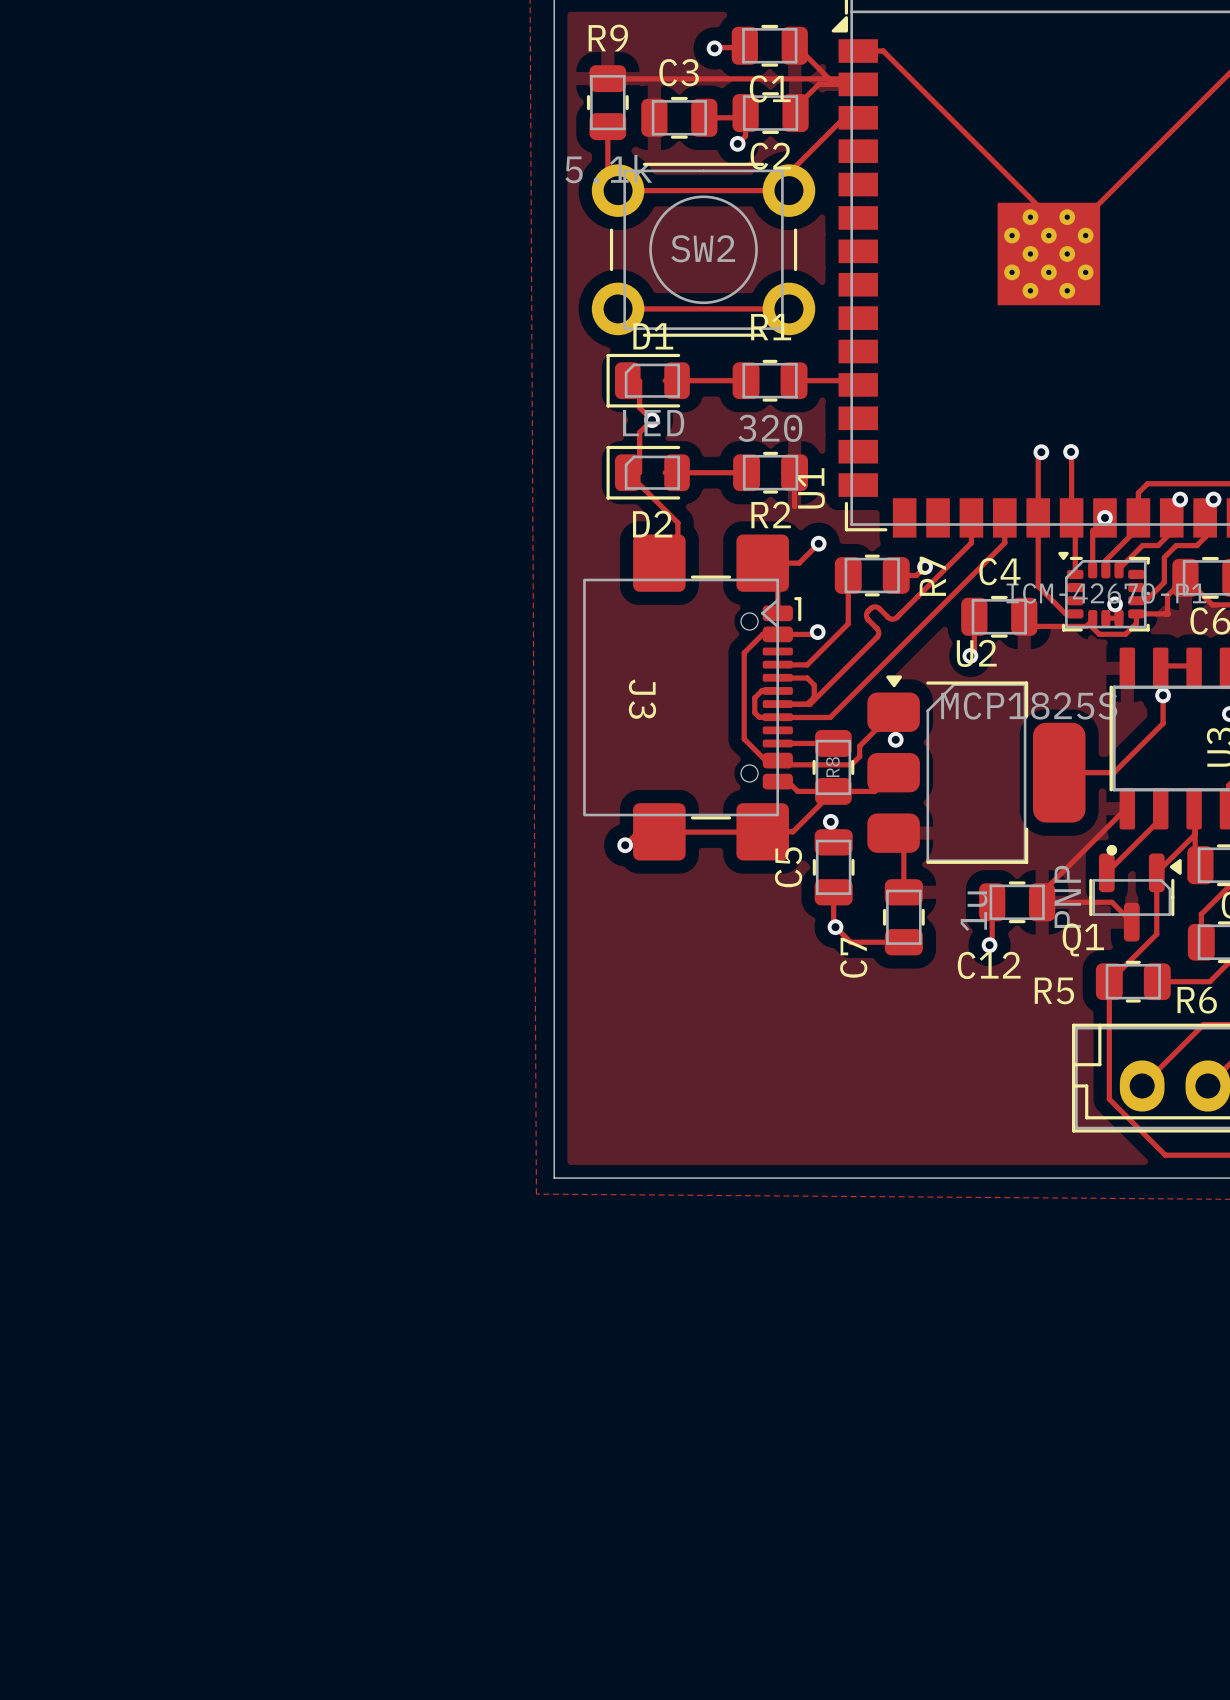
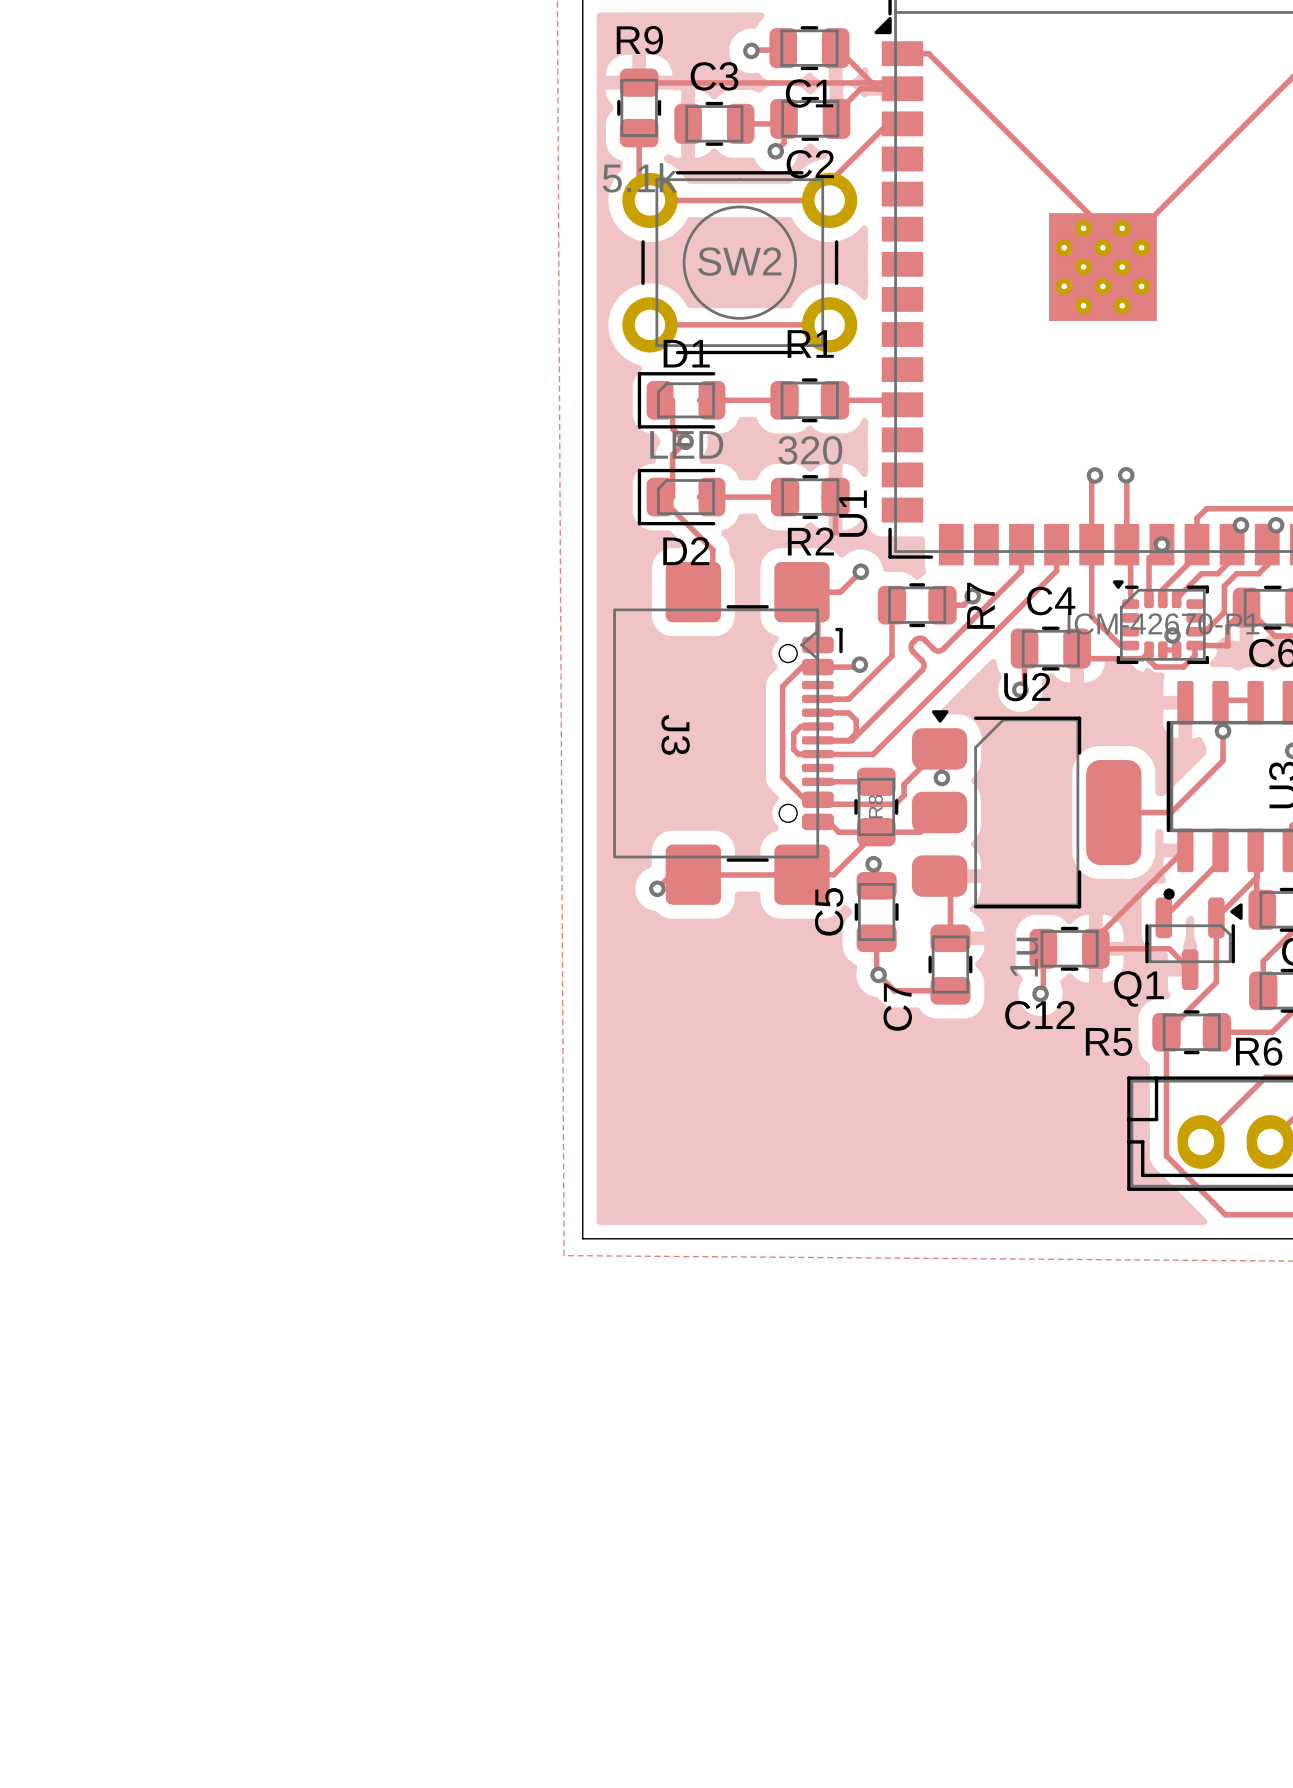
U2 value: MCP1825S (1029, 705) -> none
Q1 value: PNP (1067, 896) -> none

